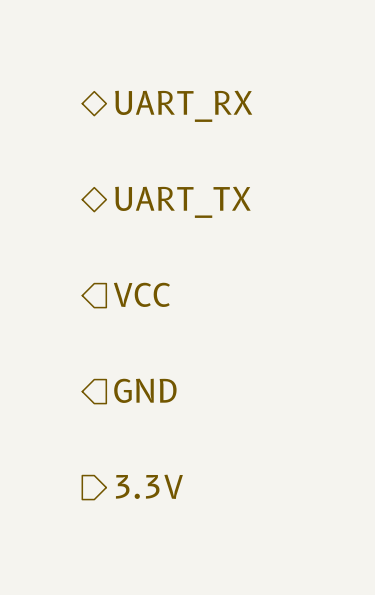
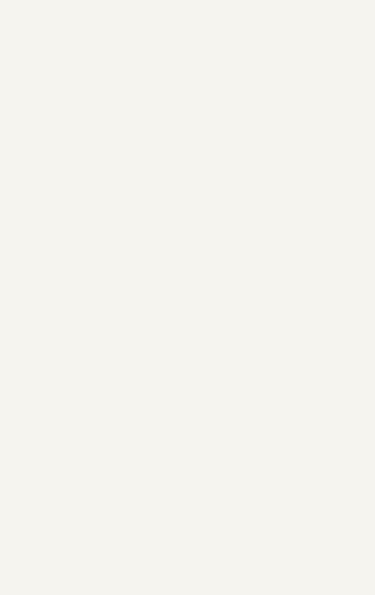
hierarchical label: UART_RX (183, 106) -> none
hierarchical label: UART_TX (182, 202) -> none
hierarchical label: VCC (141, 294) -> none
hierarchical label: GND (145, 390) -> none
hierarchical label: 3.3V (149, 486) -> none

